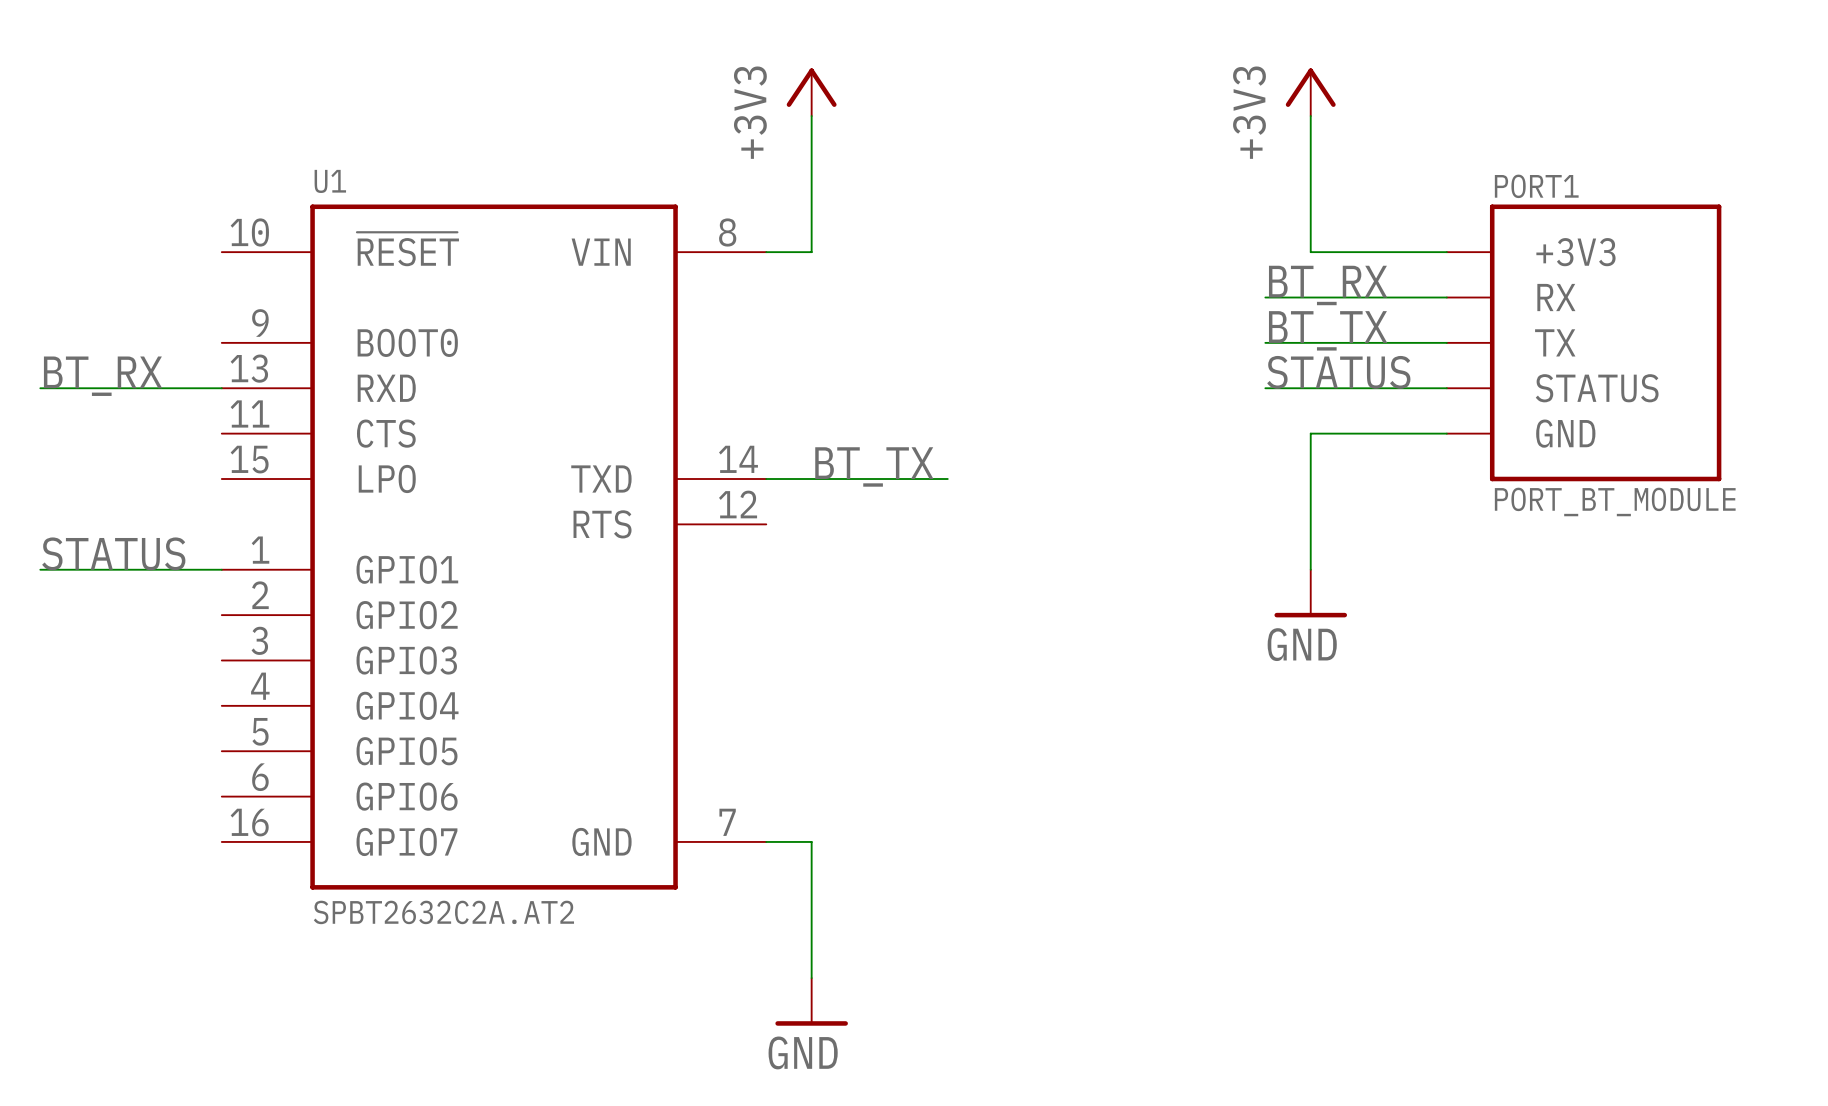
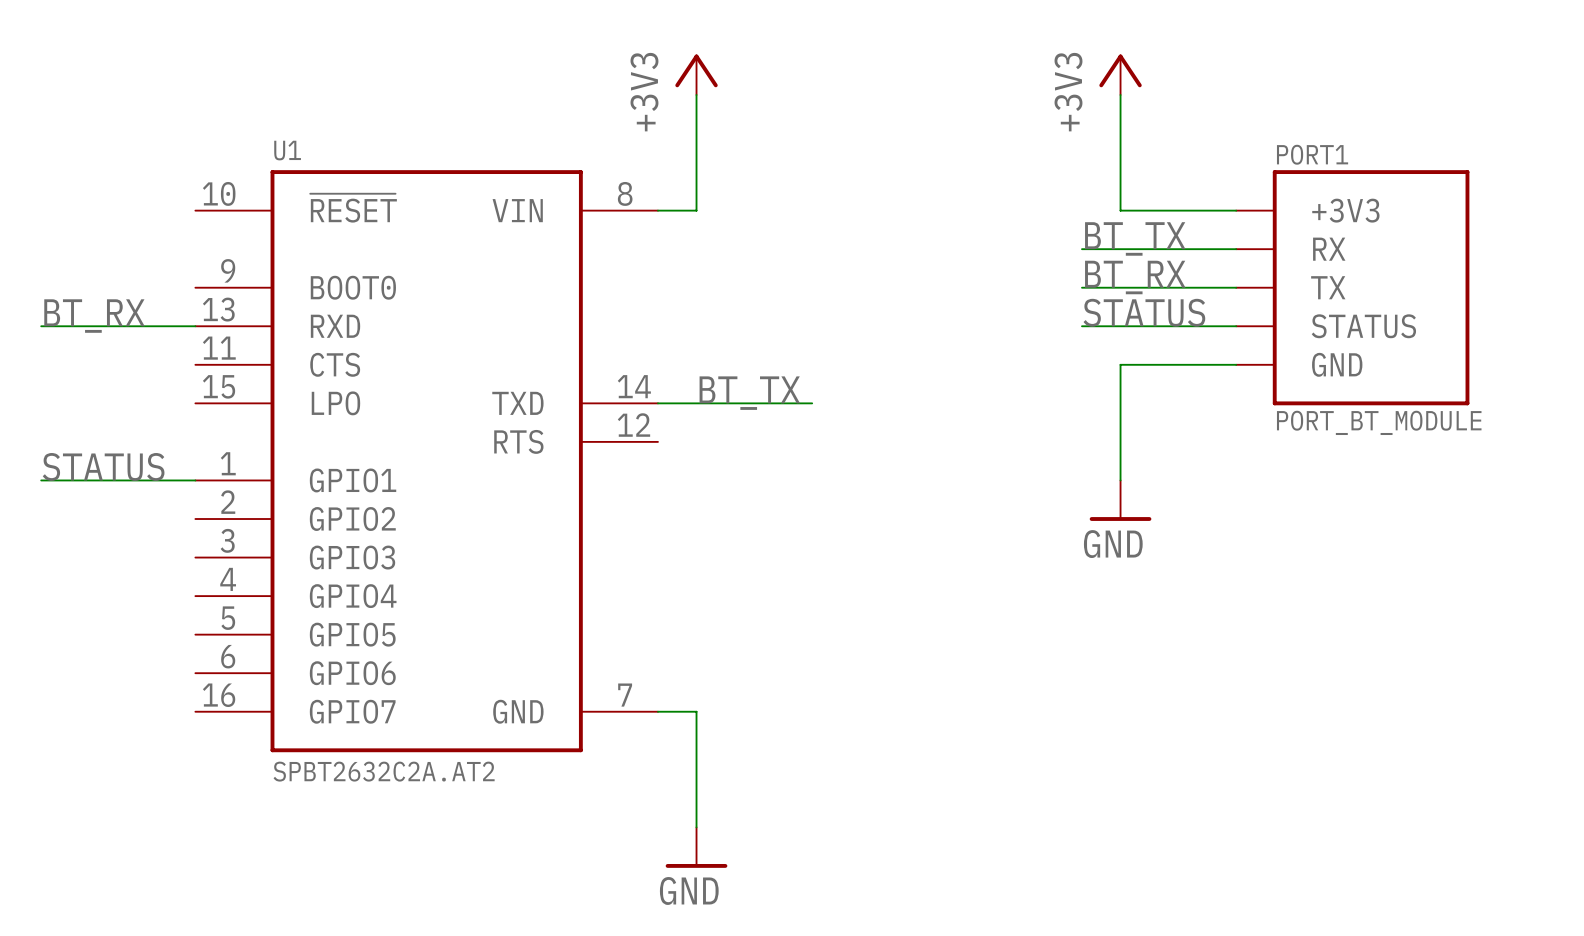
label: BT_RX (1328, 285) -> BT_TX (1135, 238)
label: BT_TX (1328, 330) -> BT_RX (1135, 277)

